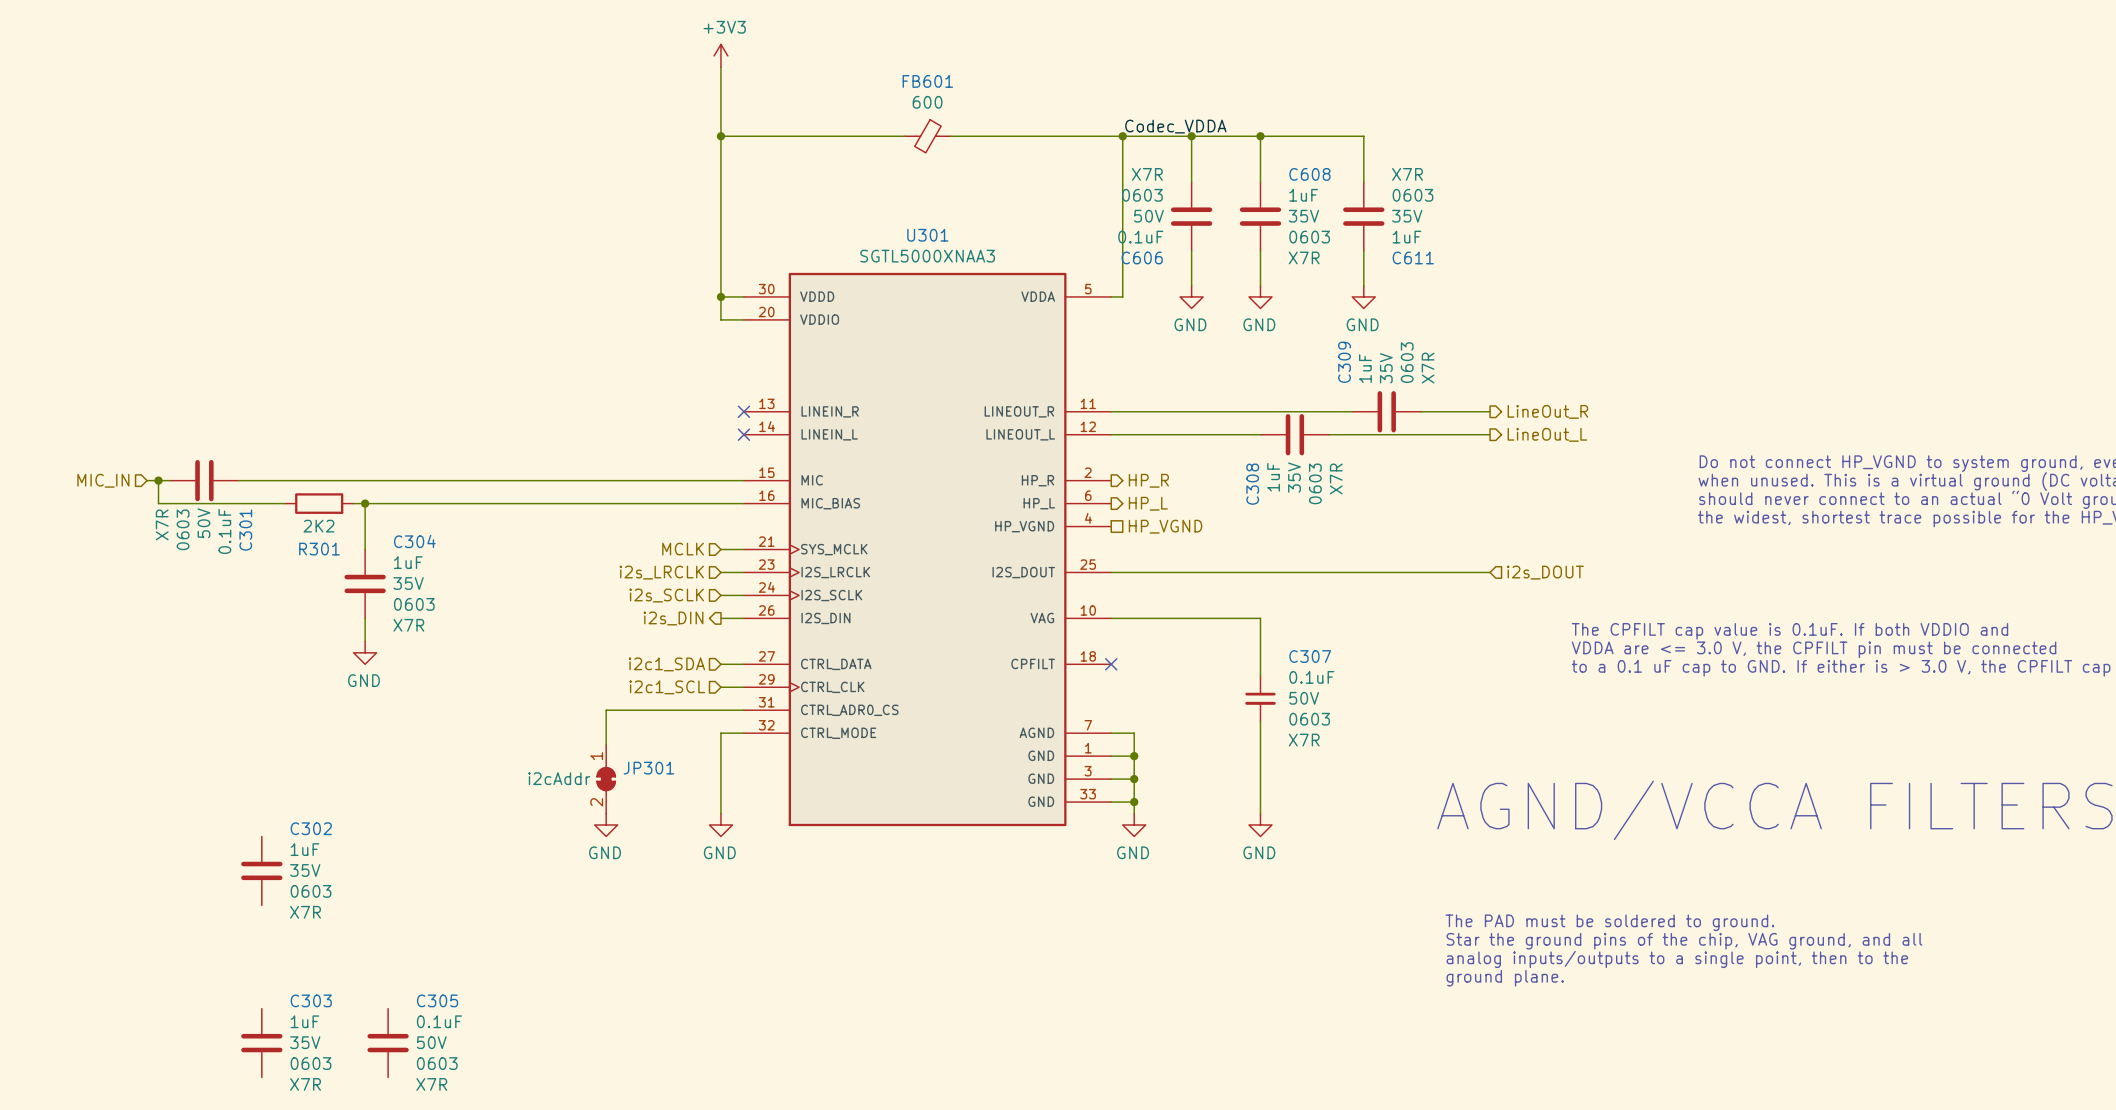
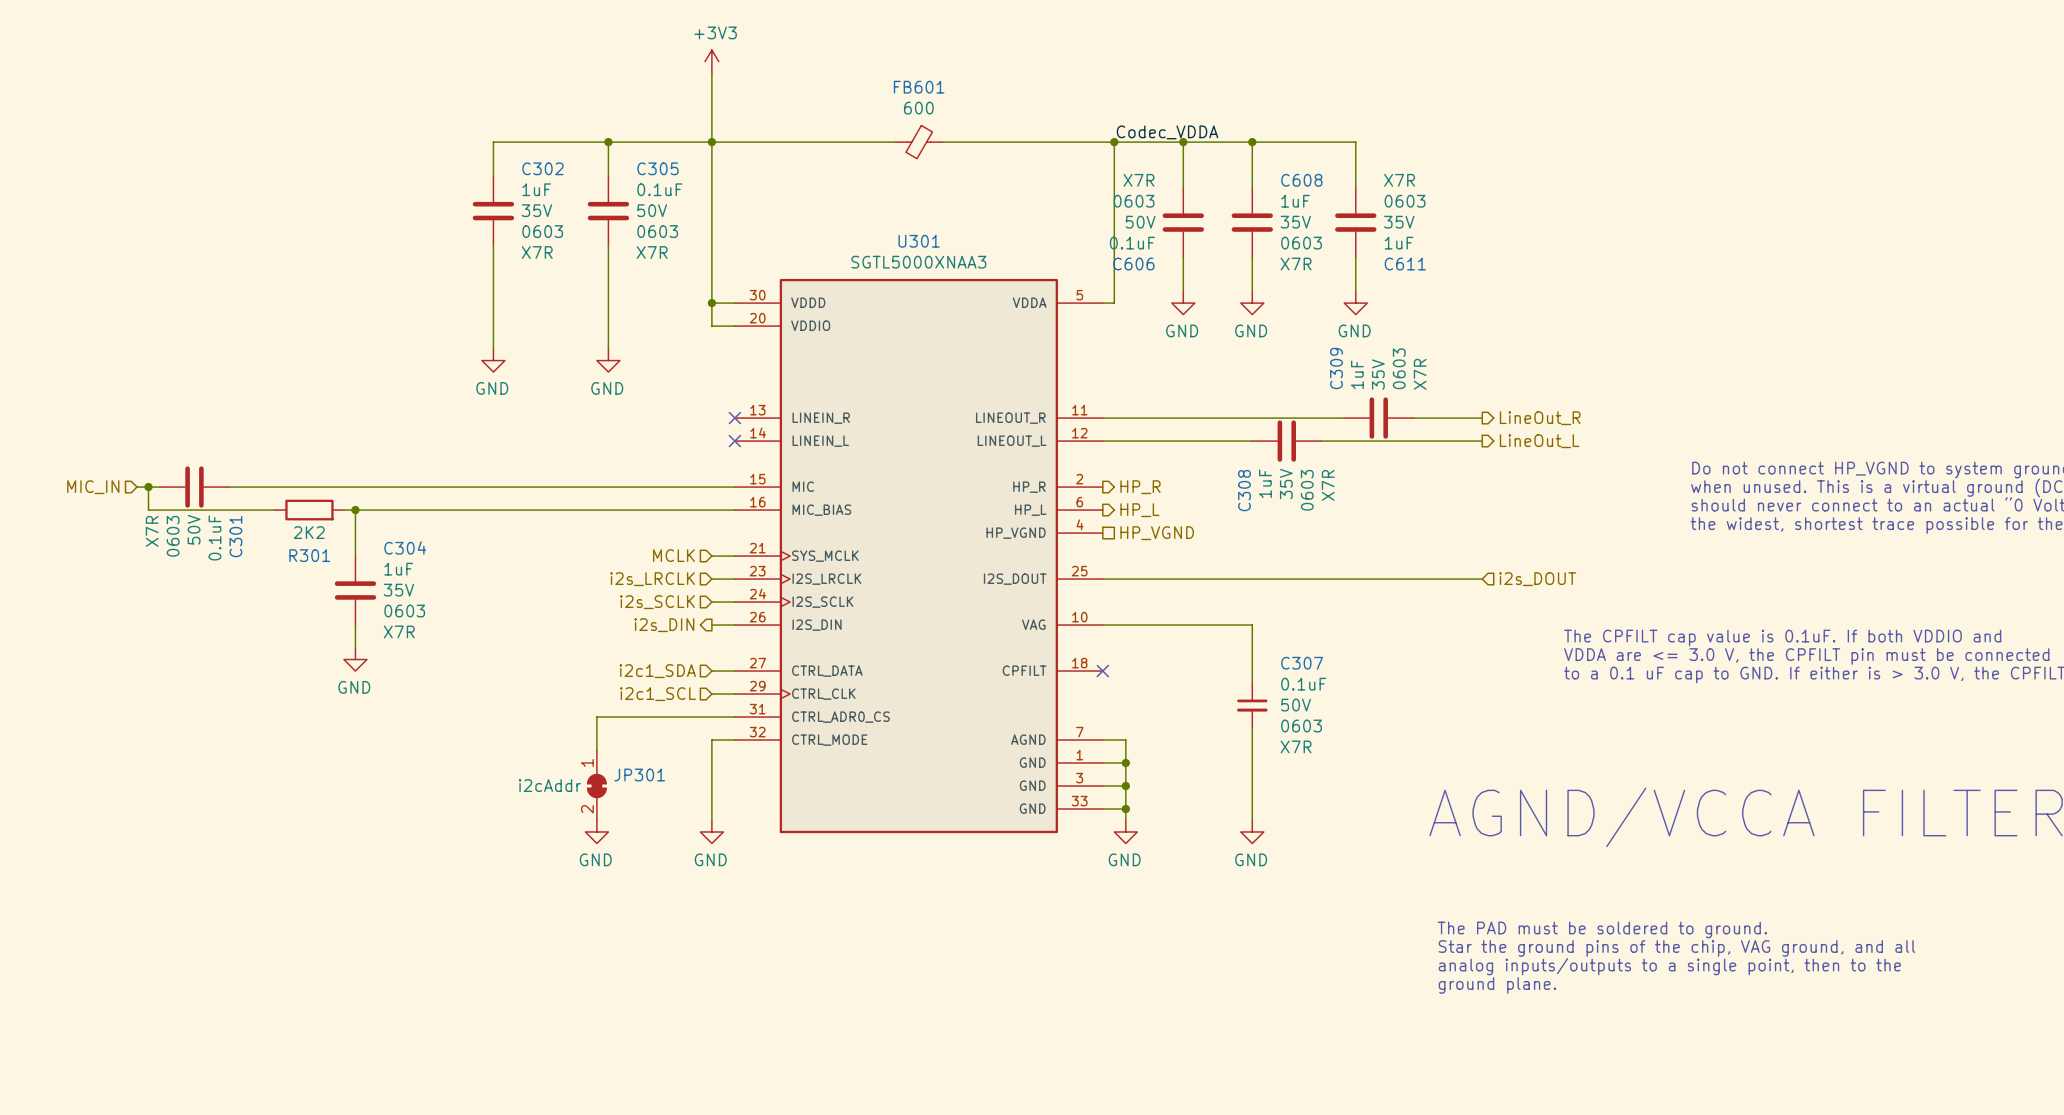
wire: none -> (608, 142) (608, 176)
junction: none -> (608, 142)
wire: none -> (711, 142) (493, 142) (493, 176)
wire: none -> (493, 245) (493, 349)
wire: none -> (608, 245) (608, 349)
power symbol: none -> GND (493, 360)
power symbol: none -> GND (608, 360)
C302 position: (261, 870) -> (493, 211)
C303: 1uF (261, 1043) -> none
C305 position: (388, 1043) -> (608, 211)

